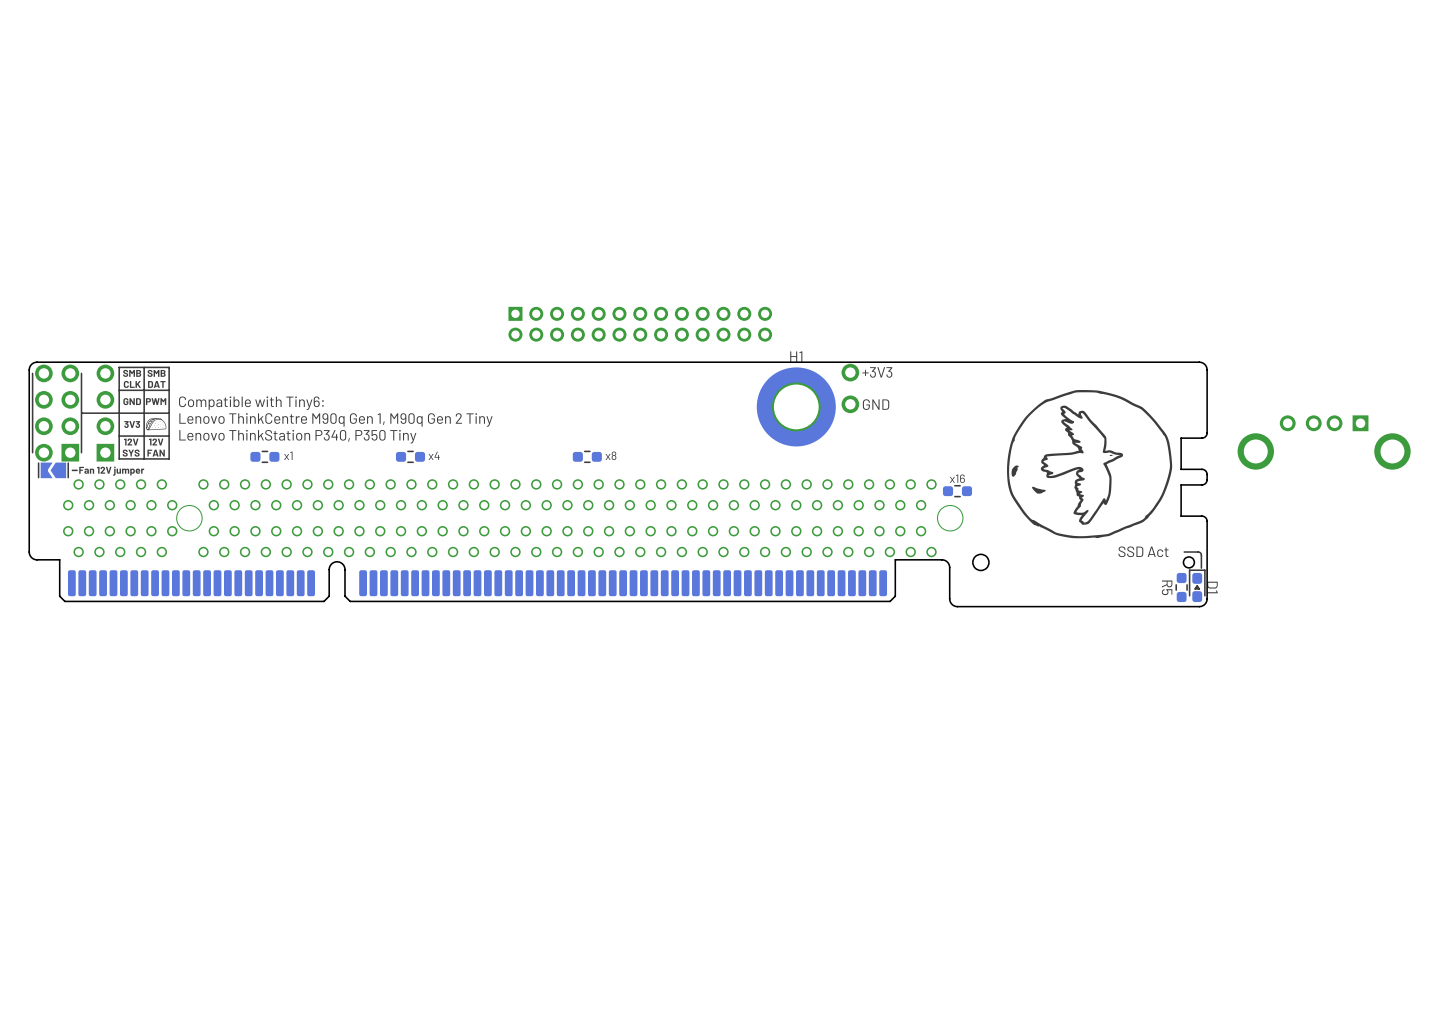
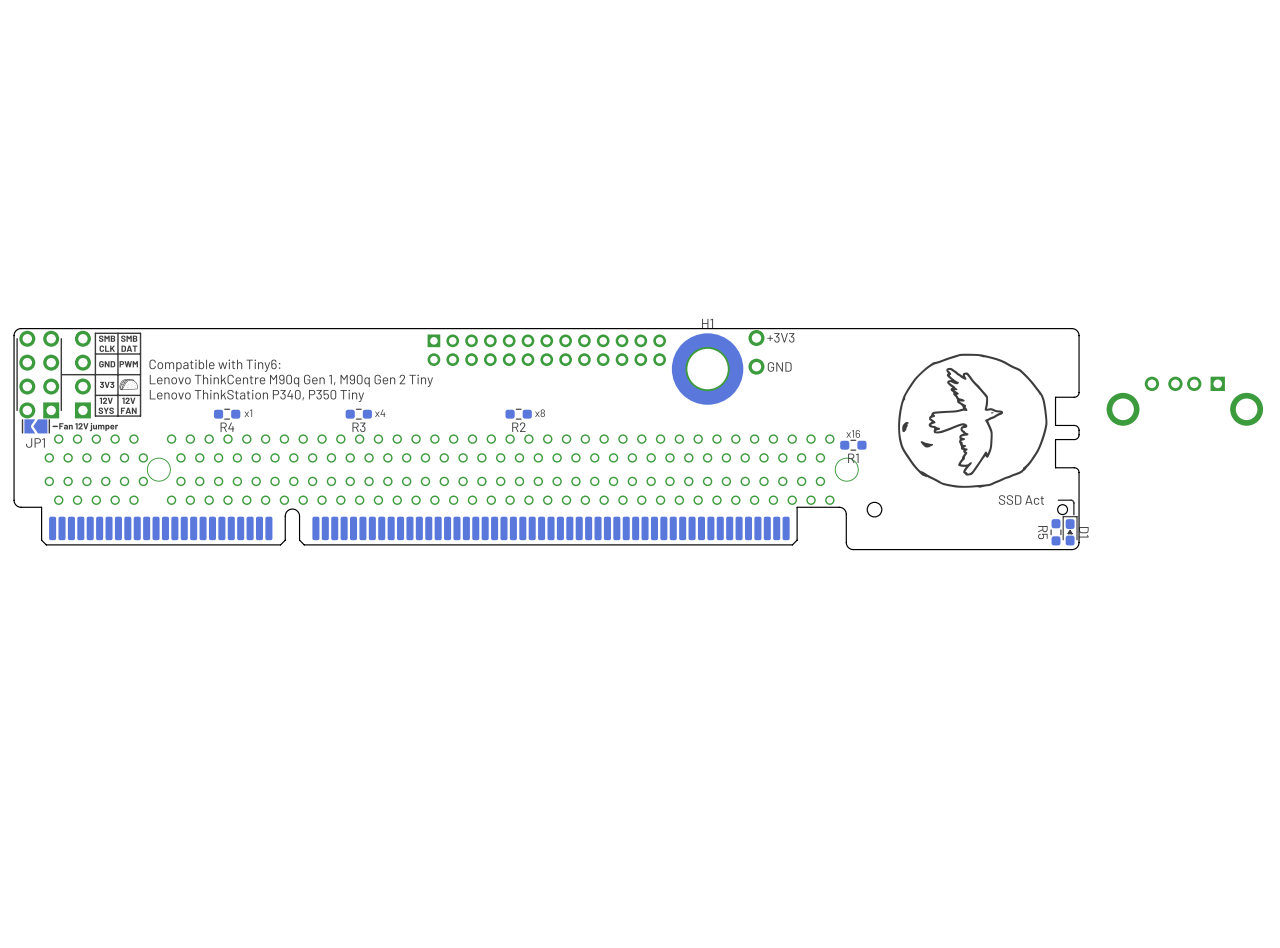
part position: (640, 324) -> (546, 350)
R4 name: none -> R4 (227, 427)
R3 name: none -> R3 (358, 427)
R2 name: none -> R2 (518, 427)
JP1 name: none -> JP1 (35, 443)
R1 name: none -> R1 (853, 458)

